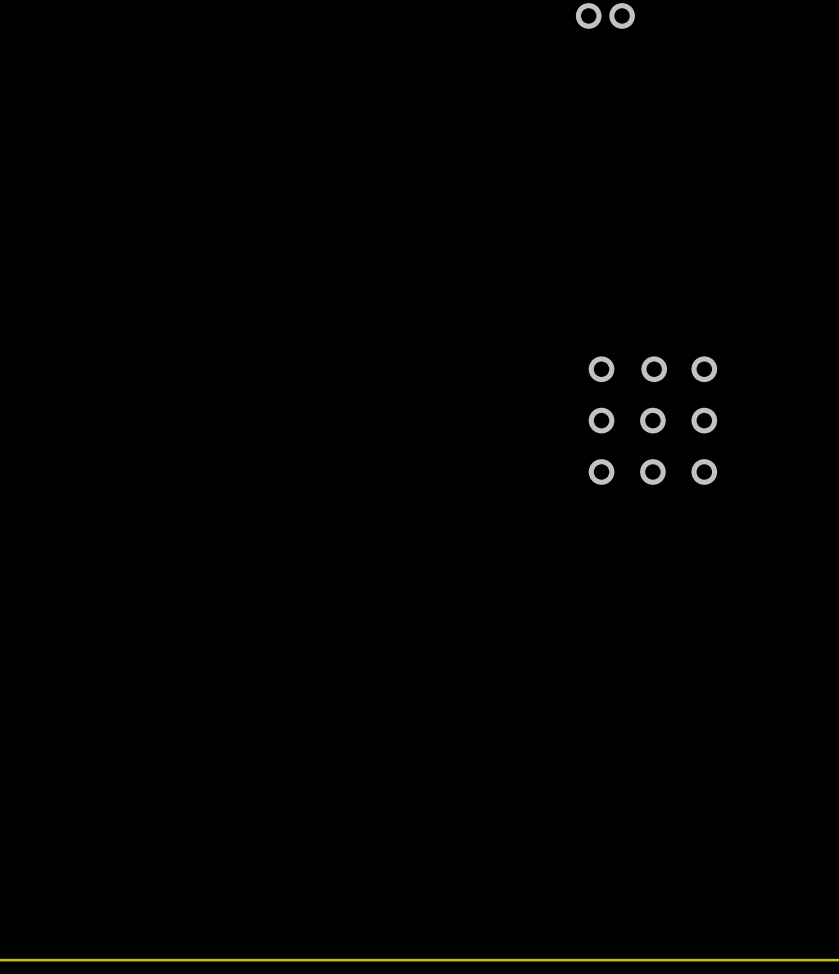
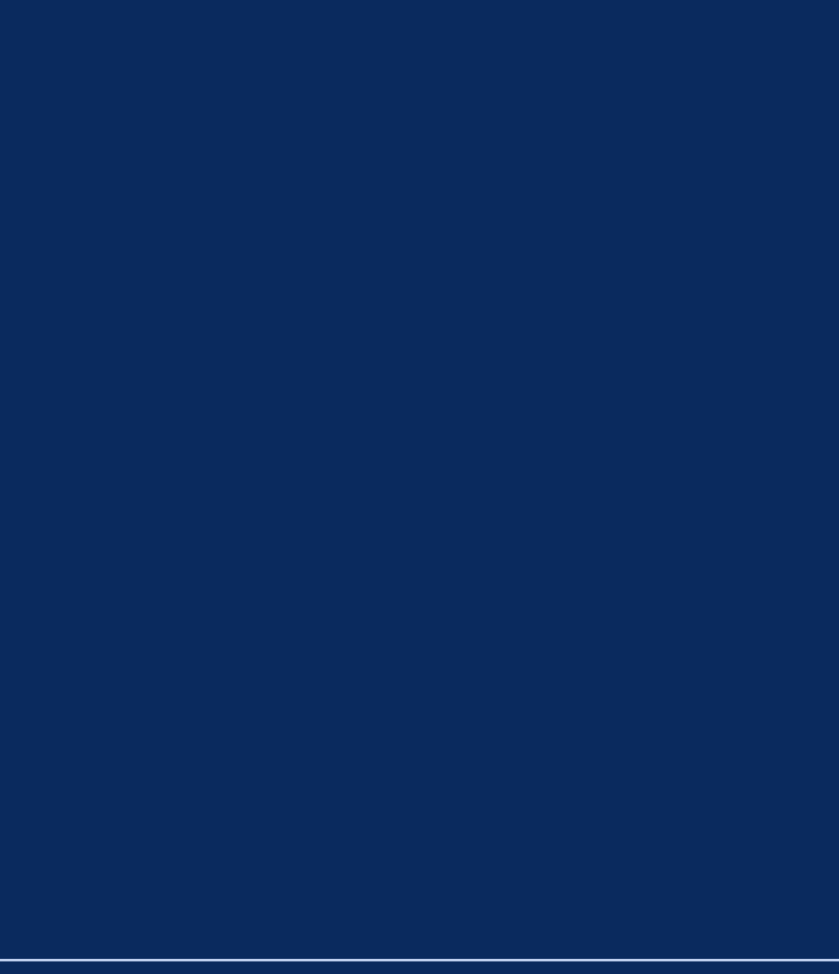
via: (588, 15) -> none
via: (622, 15) -> none
via: (601, 369) -> none
via: (654, 369) -> none
via: (704, 369) -> none
via: (601, 420) -> none
via: (652, 420) -> none
via: (704, 420) -> none
via: (601, 471) -> none
via: (652, 471) -> none
via: (704, 471) -> none

